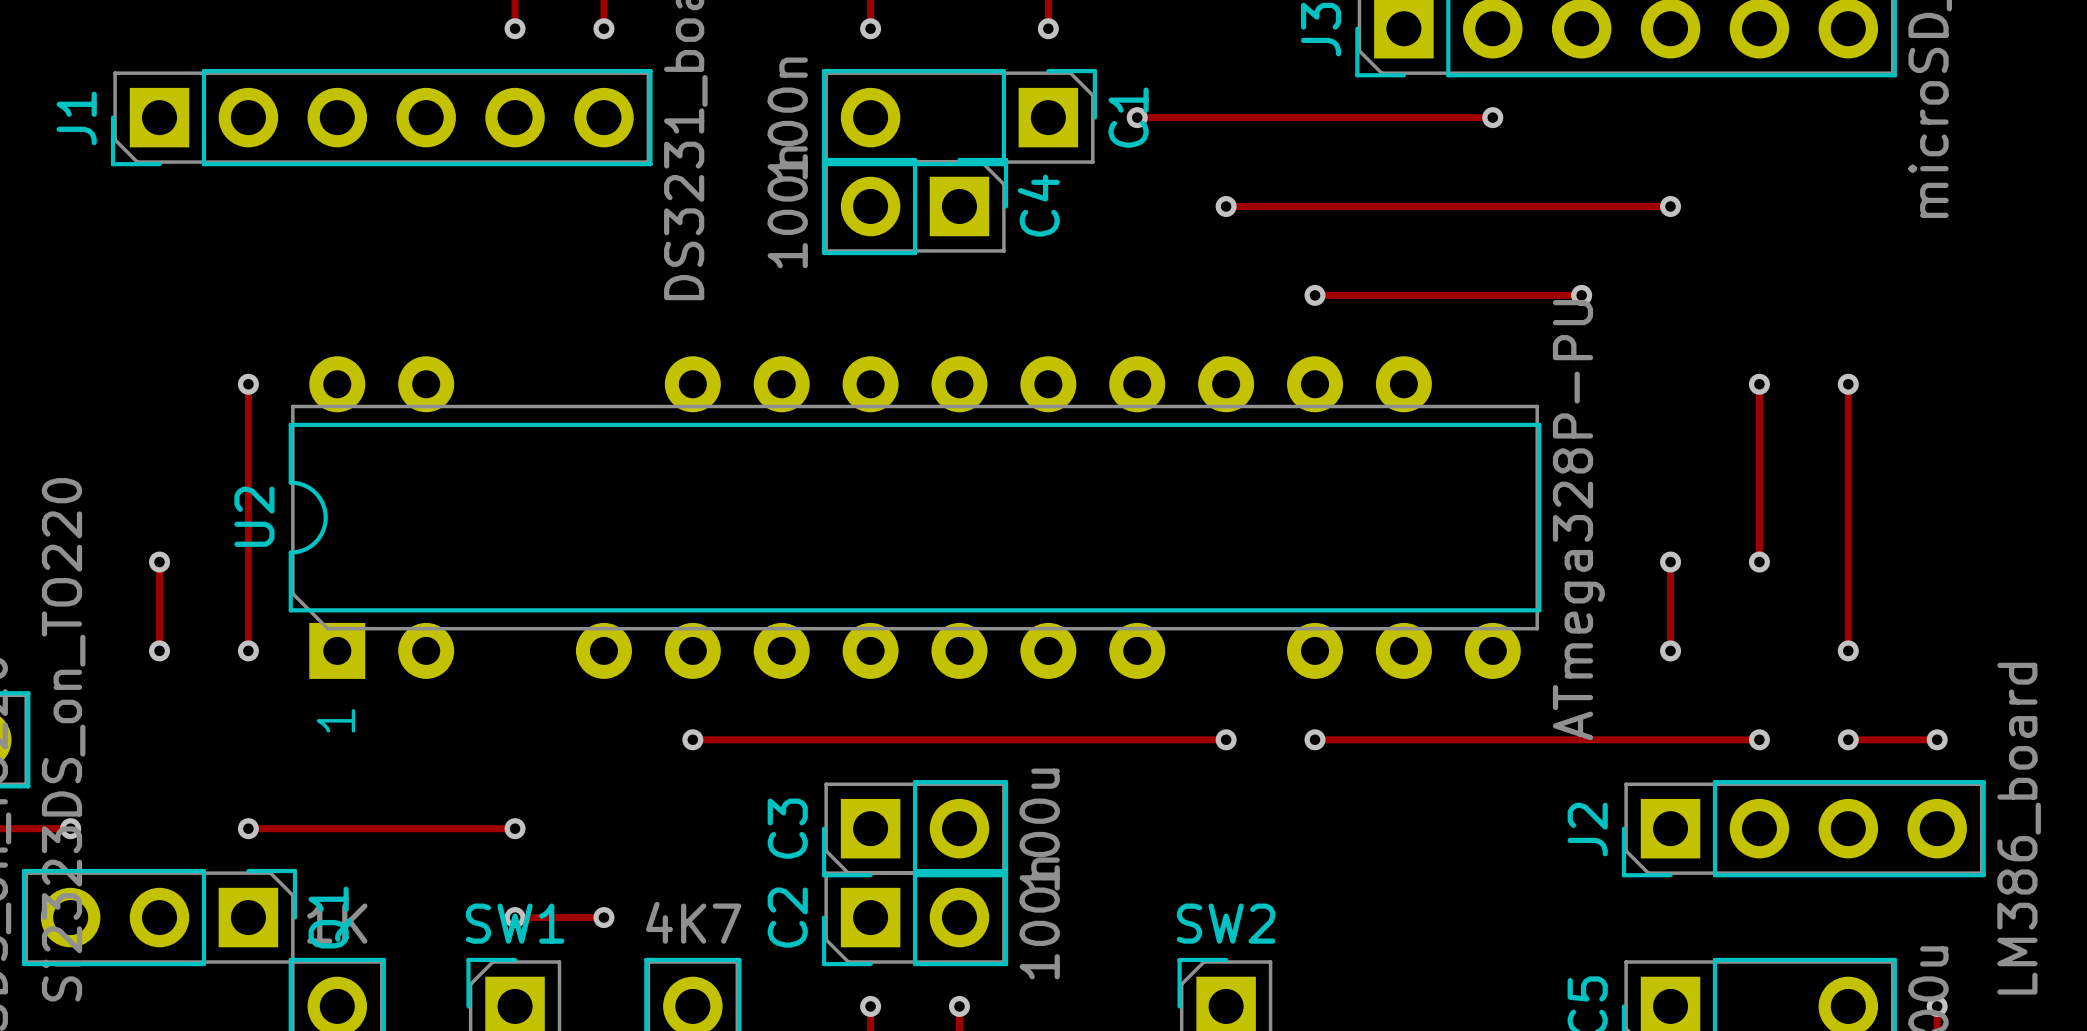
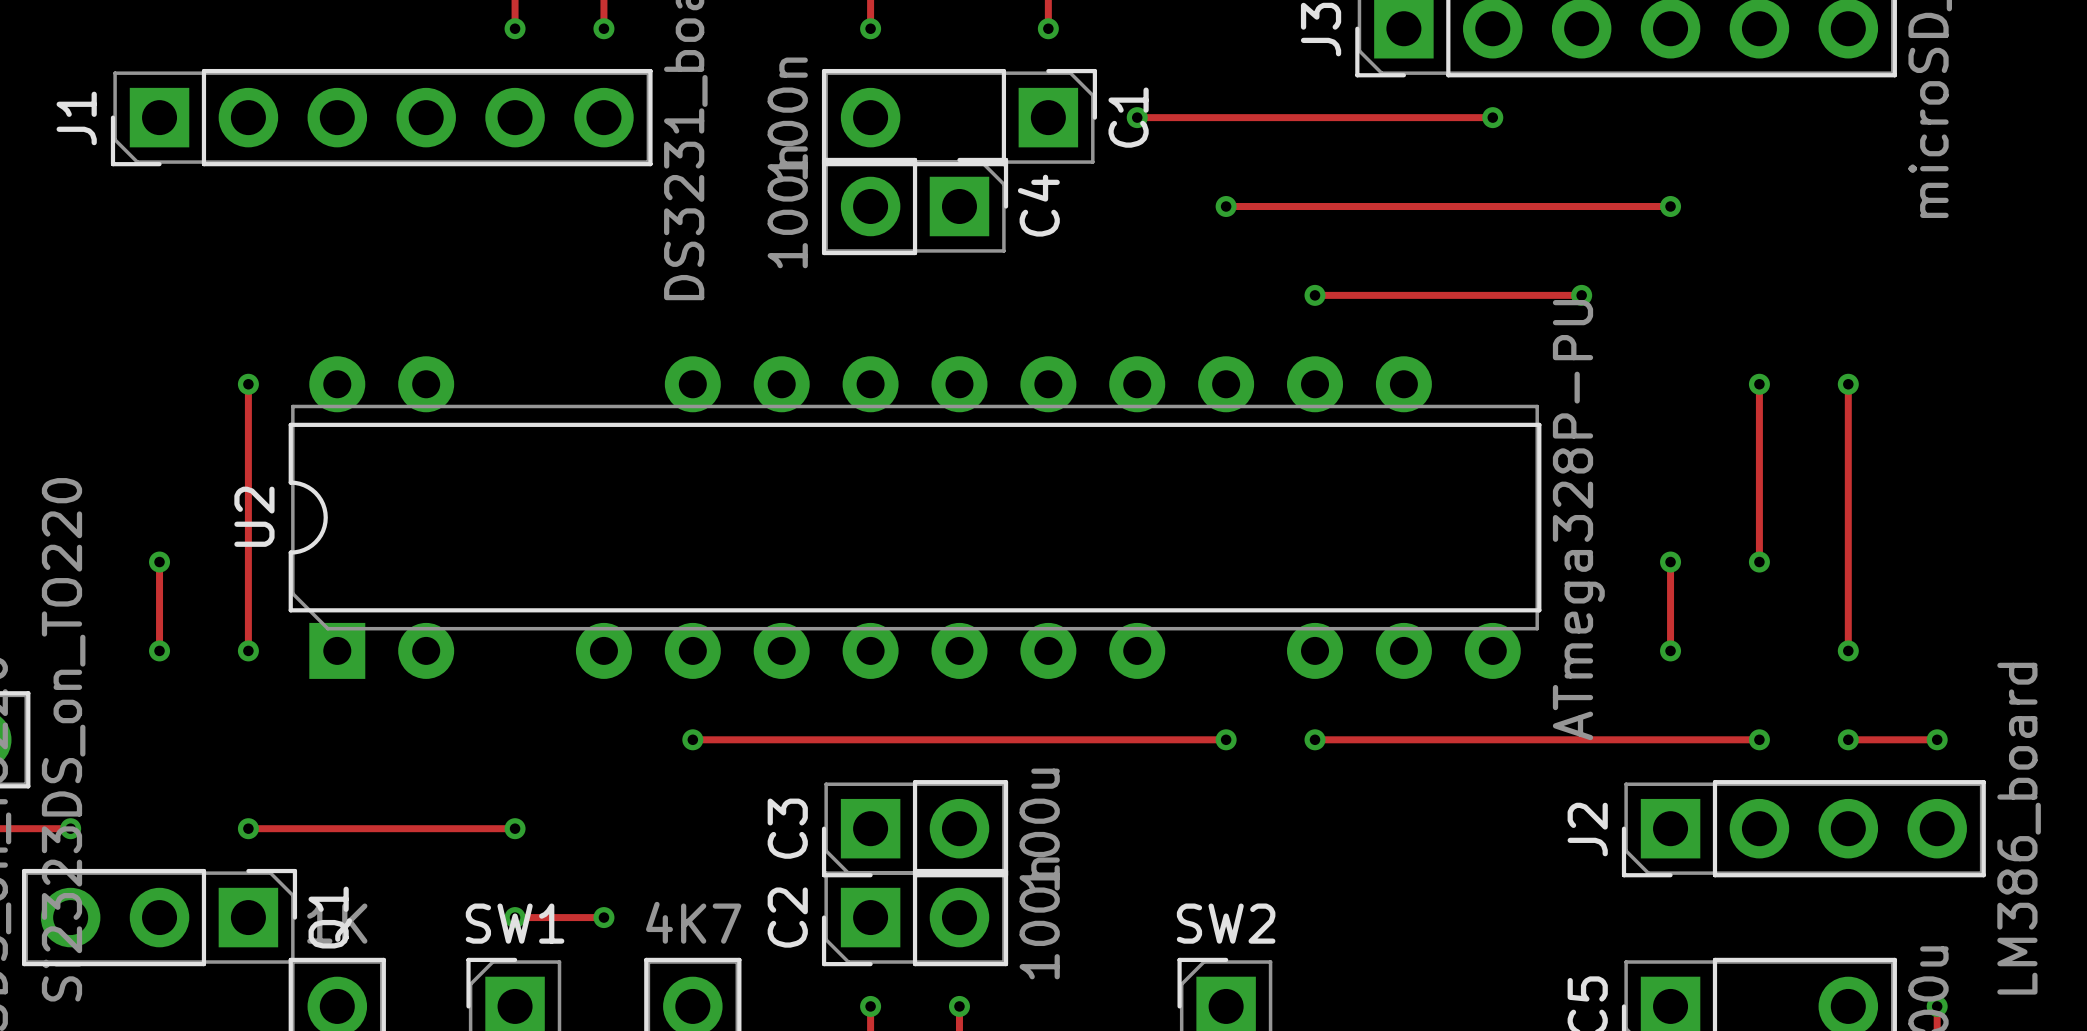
text: 1 (335, 720) -> none

